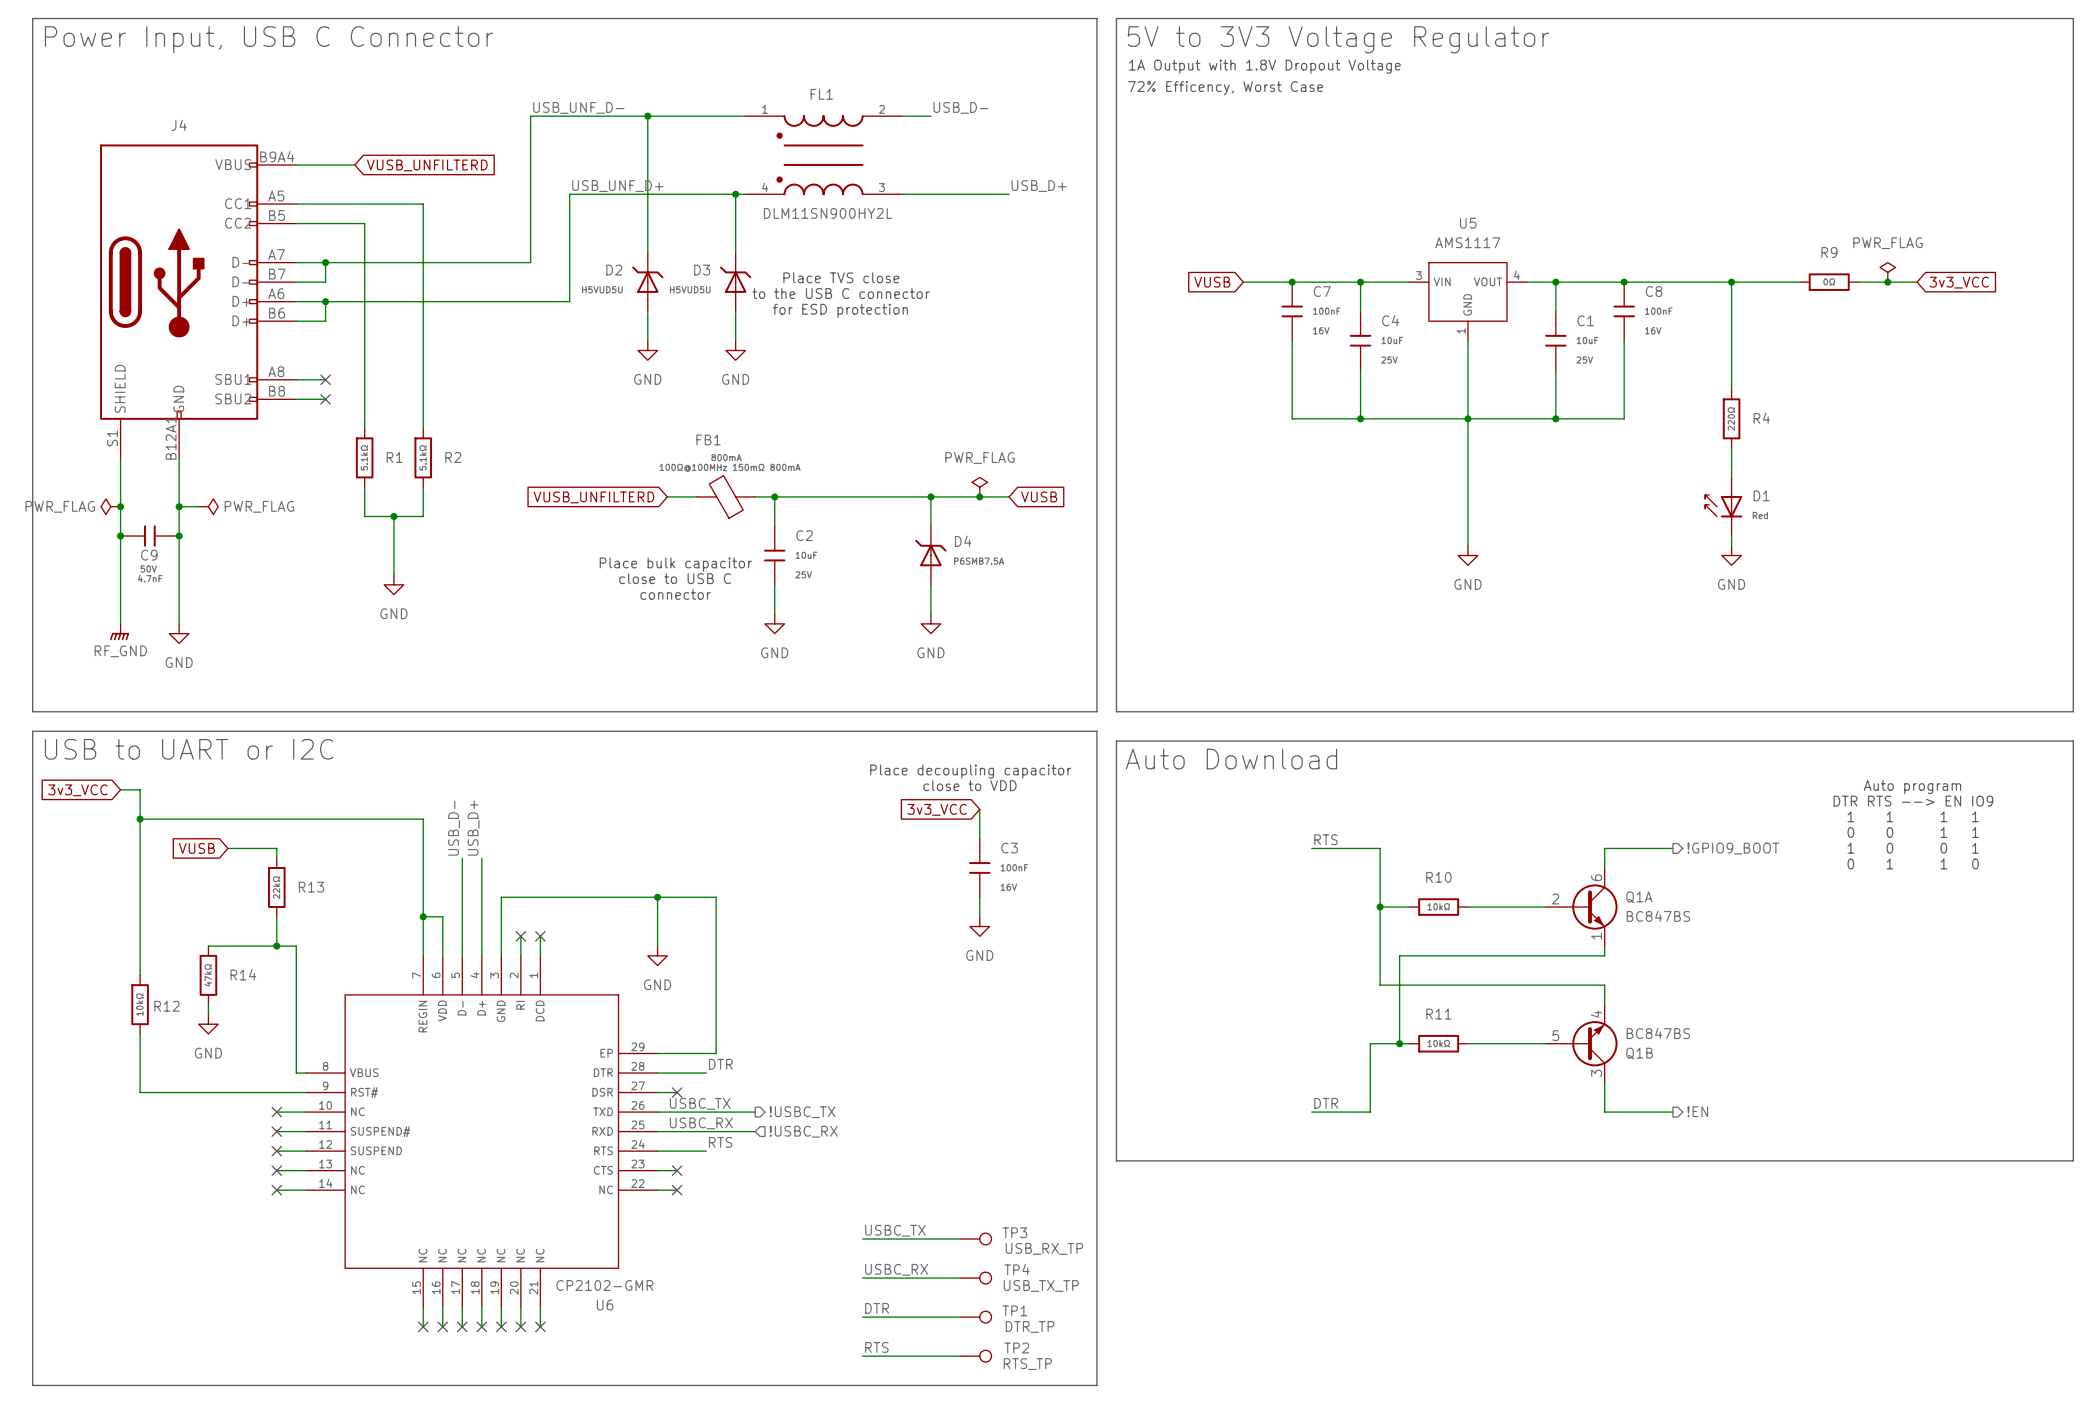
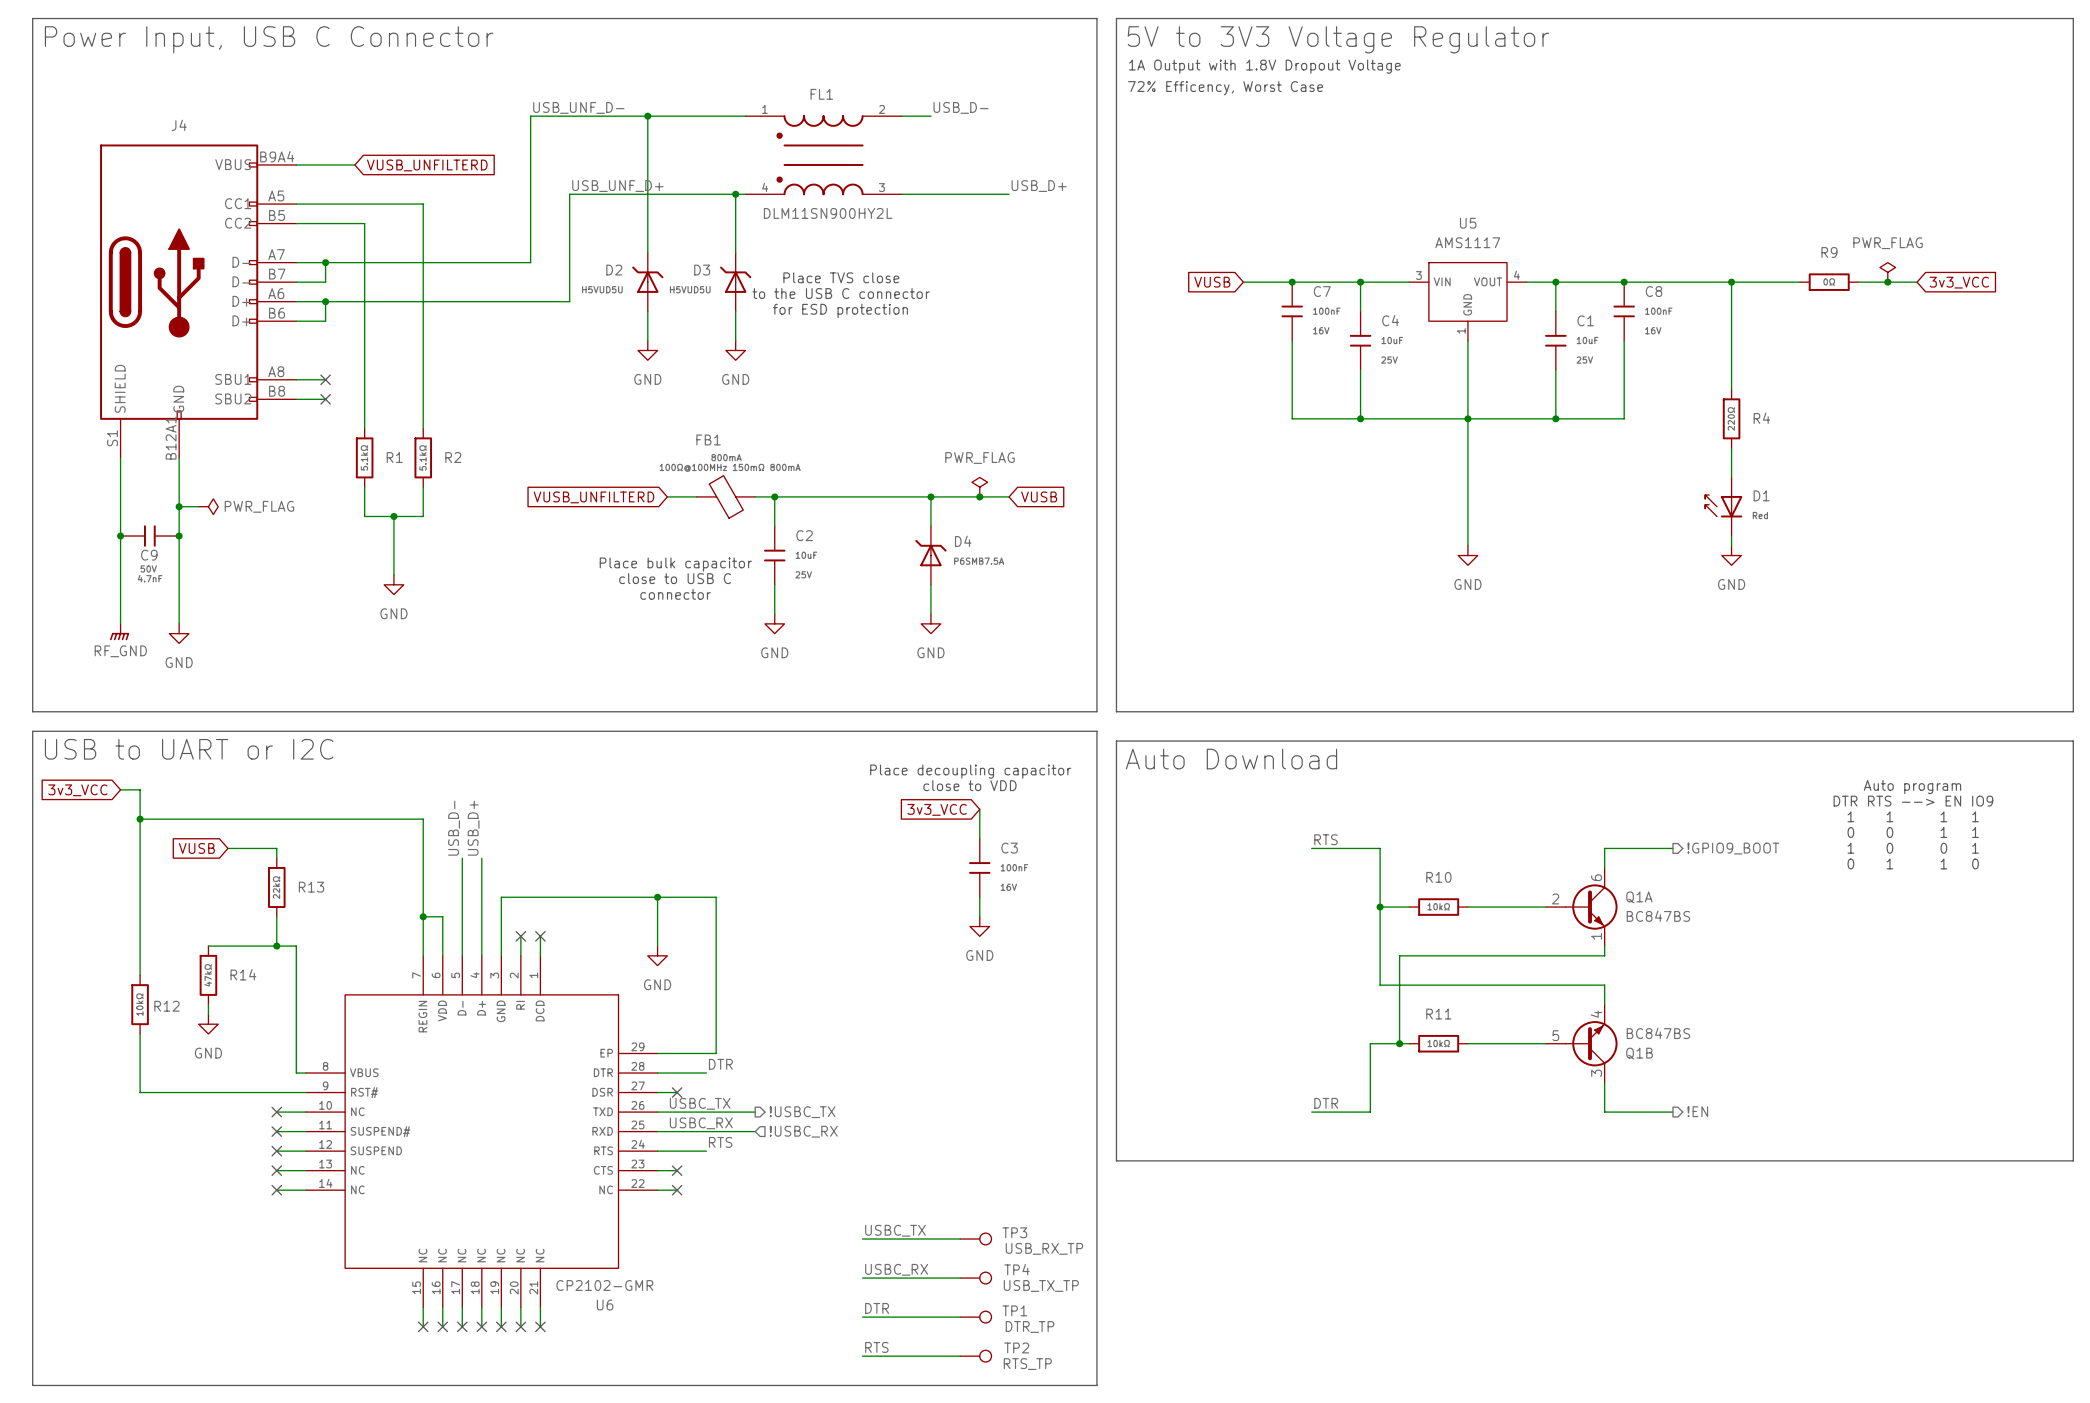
power symbol: PWR_FLAG (110, 506) -> none
junction: (120, 506) -> none

